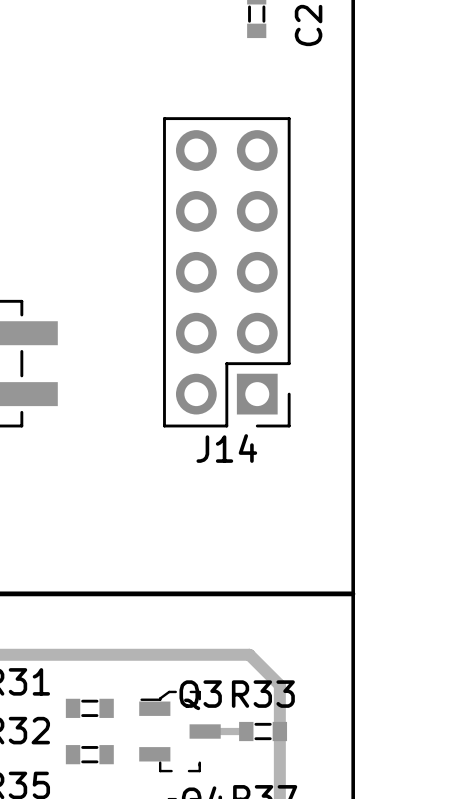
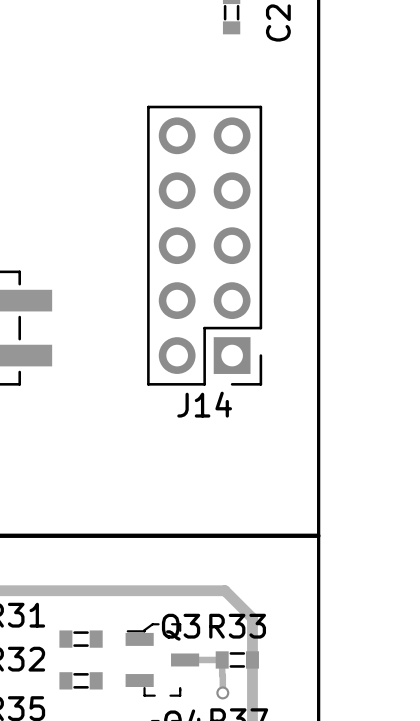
track: none -> (222, 659) (222, 692)
via: none -> (222, 692)

